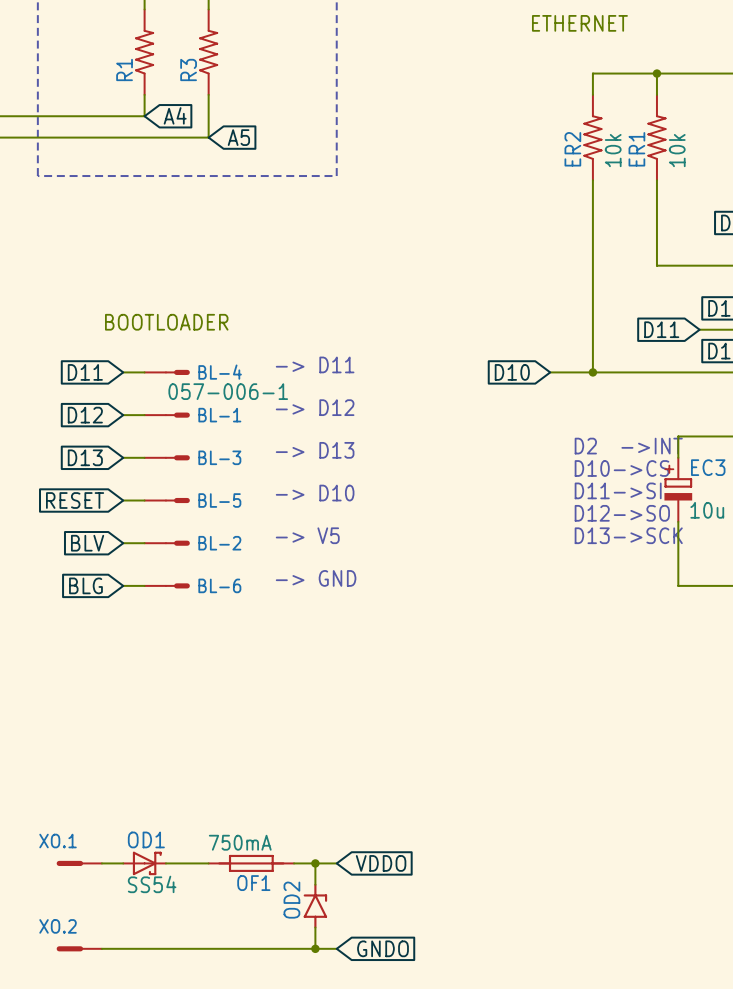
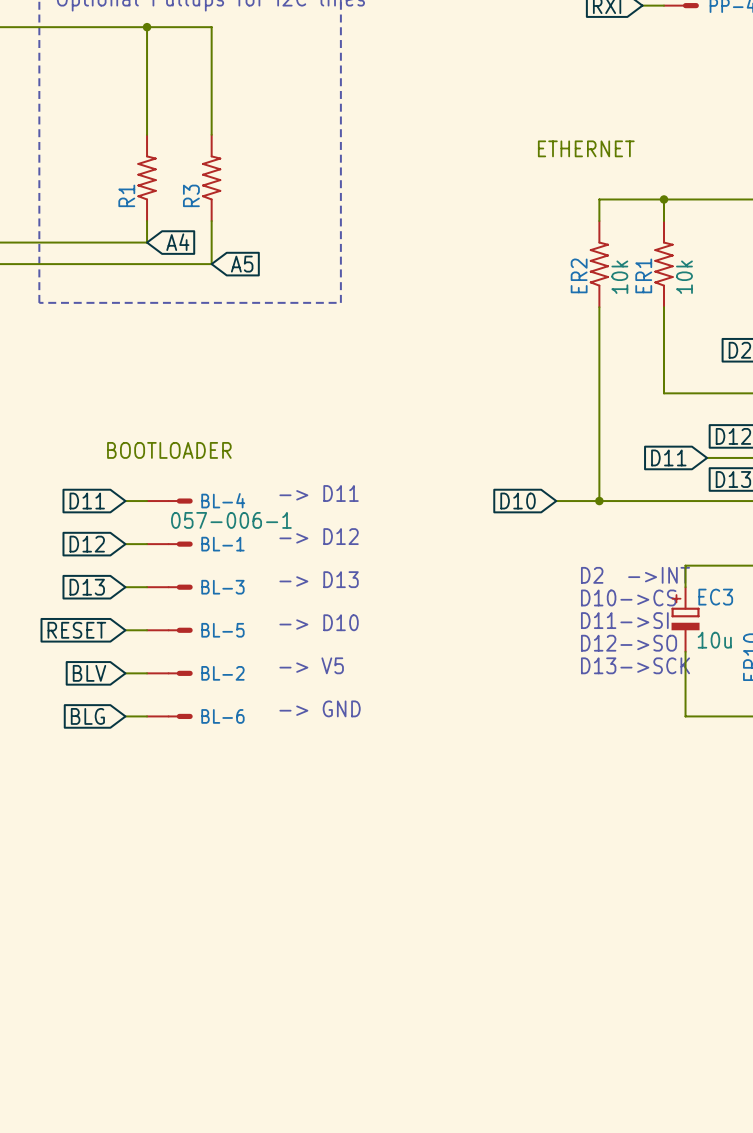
XO.1: (79, 863) -> none
wire: (101, 863) (123, 863) -> none
OD1: SS54 (144, 863) -> none
wire: (165, 863) (208, 863) -> none
OF1: 750mA (251, 863) -> none
wire: (294, 863) (336, 863) -> none
wire: (315, 863) (315, 884) -> none
junction: (315, 863) -> none
global label: VDDO (381, 863) -> none
OD2: (315, 906) -> none
wire: (315, 927) (315, 948) -> none
XO.2: (79, 948) -> none
wire: (101, 948) (336, 948) -> none
junction: (315, 948) -> none
global label: GNDO (383, 948) -> none

